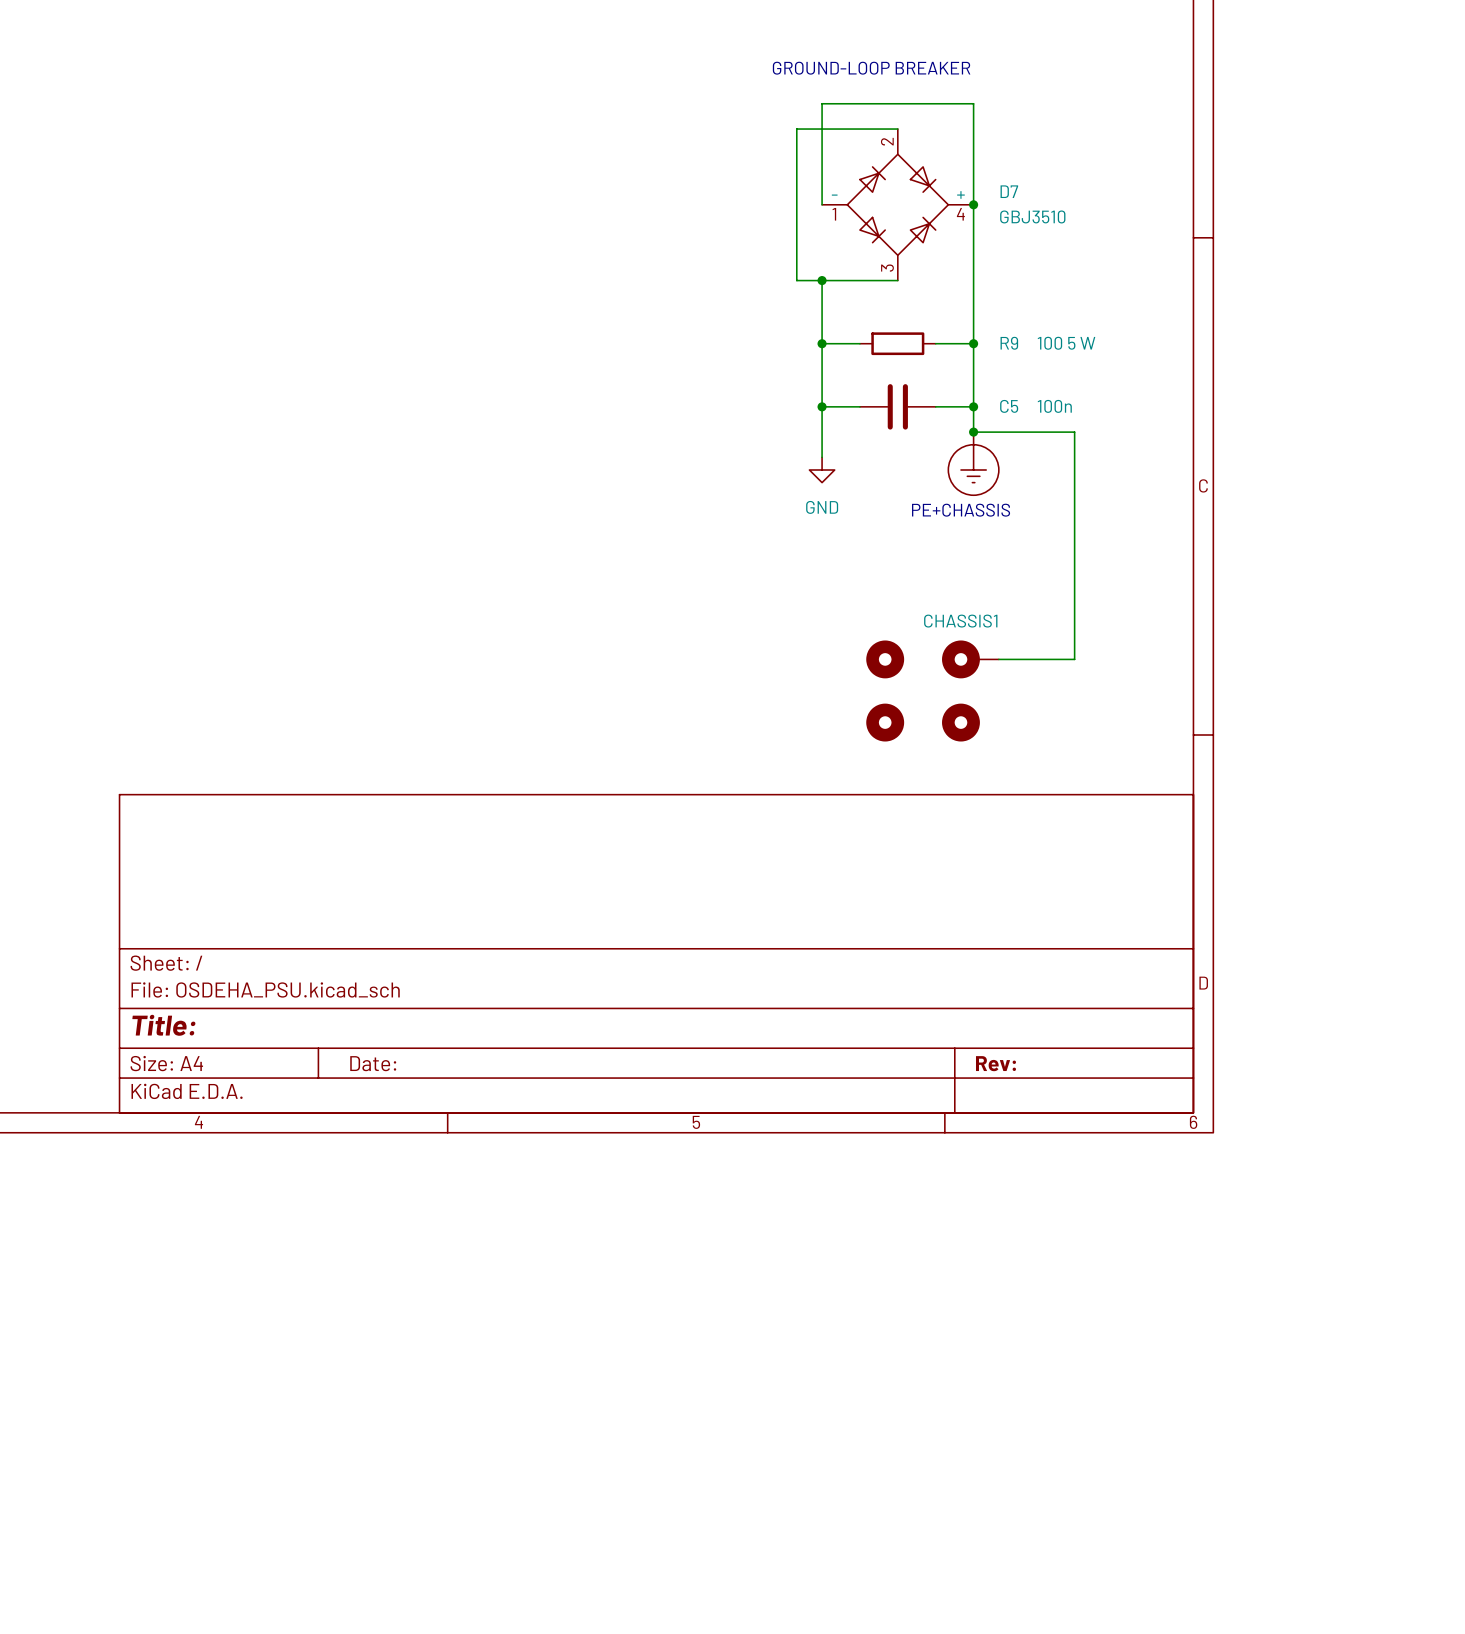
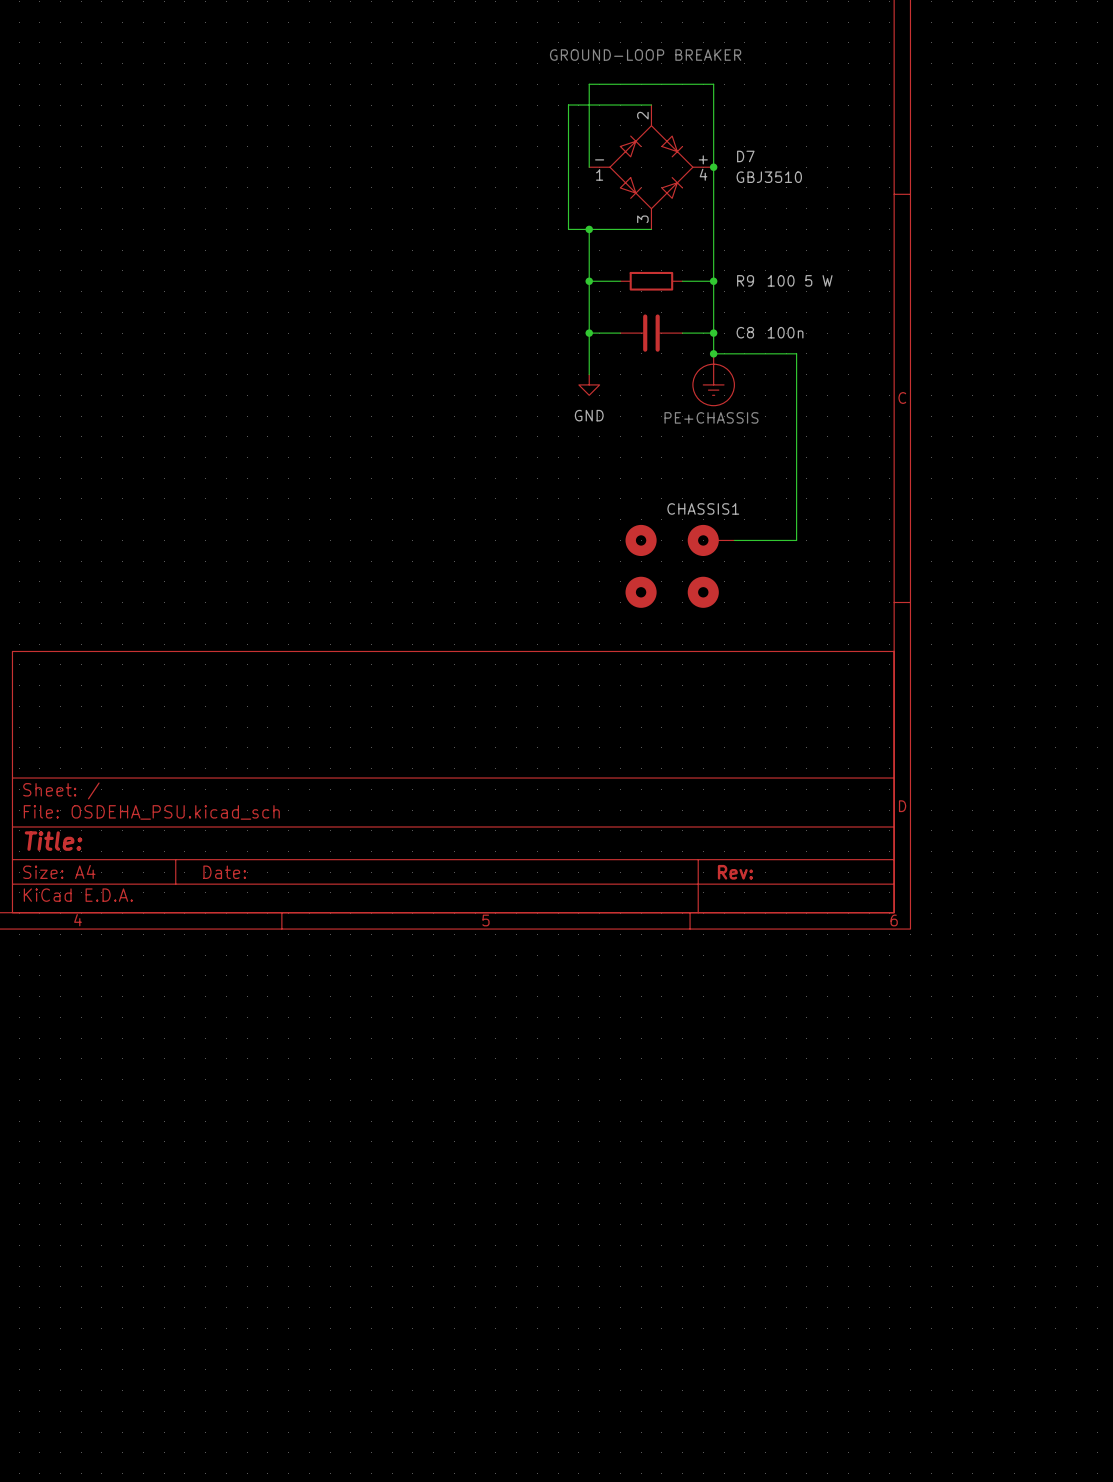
C5 name: C5 (1009, 406) -> C8 (745, 332)

